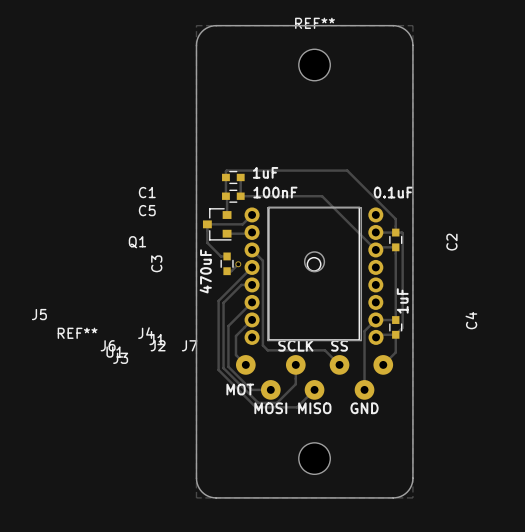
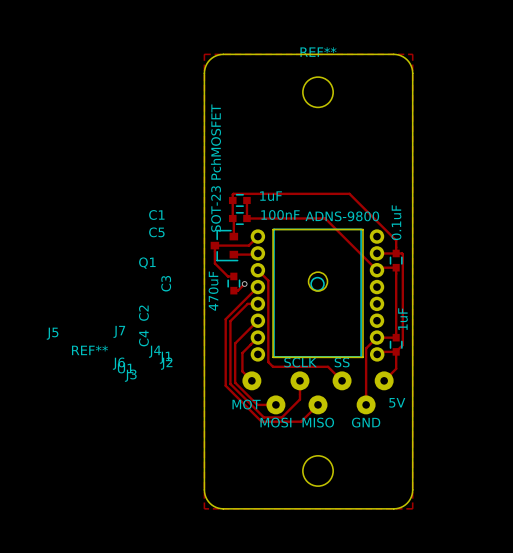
text: none -> SOT-23 PchMOSFET (215, 168)
text rotation: 0° (393, 192) -> 90° counterclockwise (396, 222)
text: none -> ADNS-9800 (342, 216)
C2 name position: C2 (451, 242) -> C2 (143, 313)
C4 name position: C4 (471, 320) -> C4 (143, 338)
J7 name position: J7 (189, 345) -> J7 (119, 331)
text: none -> 5V (397, 402)

